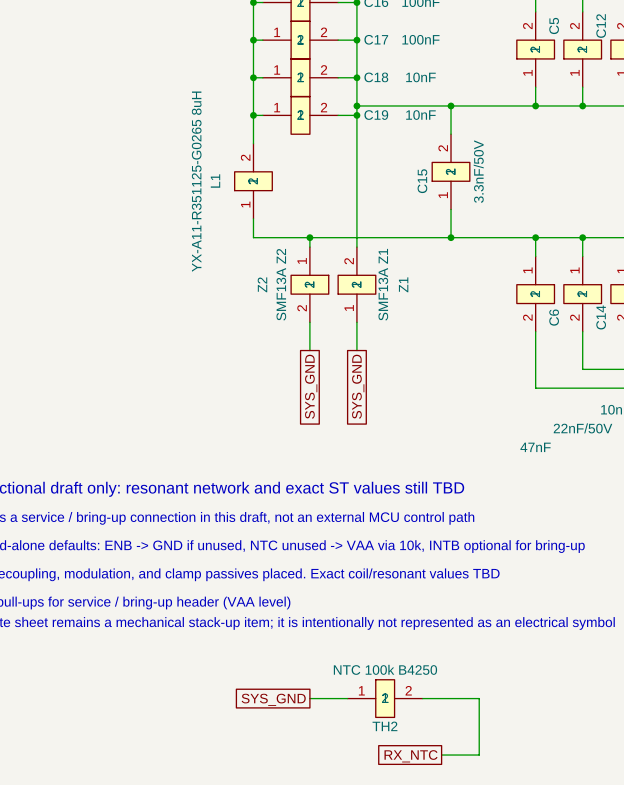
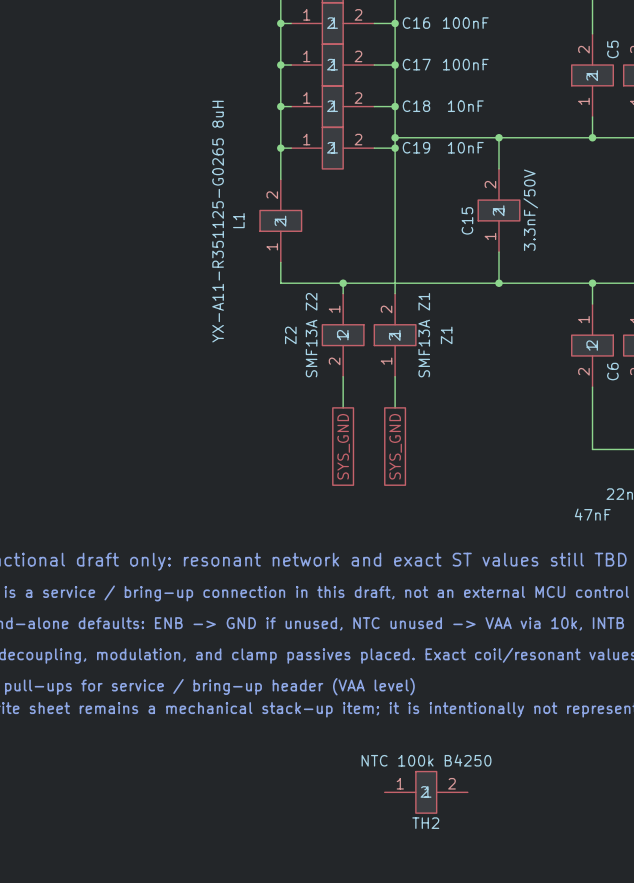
wire: (309, 698) (347, 698) -> none
wire: (422, 698) (479, 698) (479, 755) (441, 755) -> none
global label: SYS_GND (273, 699) -> none
global label: RX_NTC (411, 756) -> none

